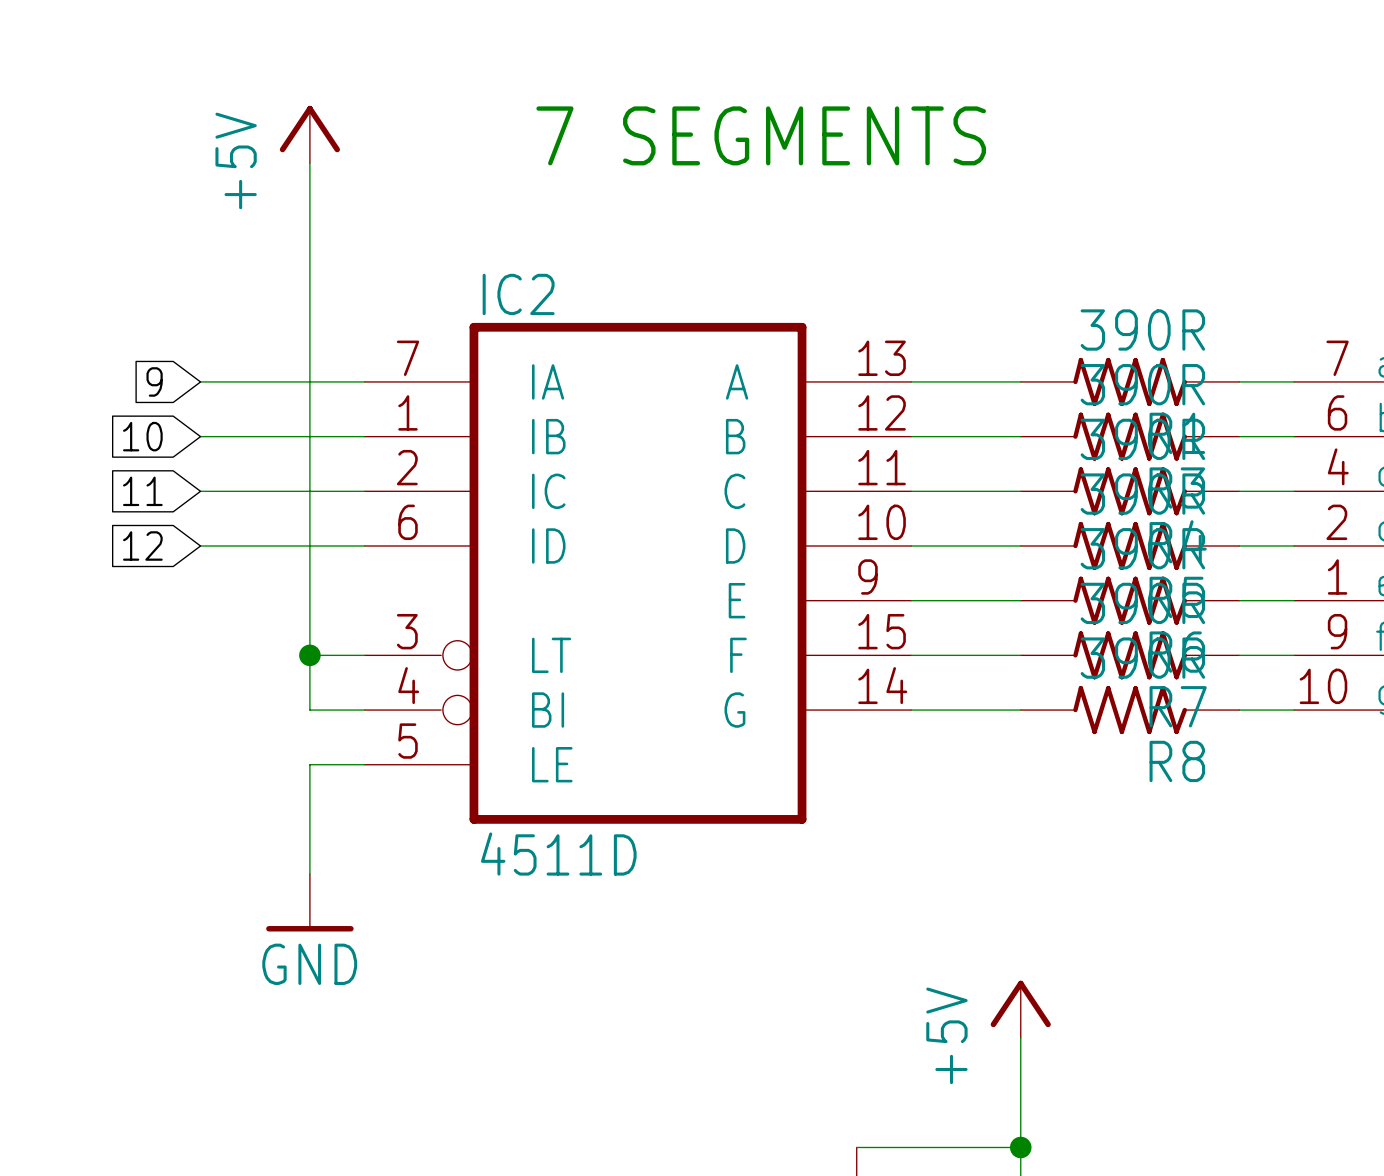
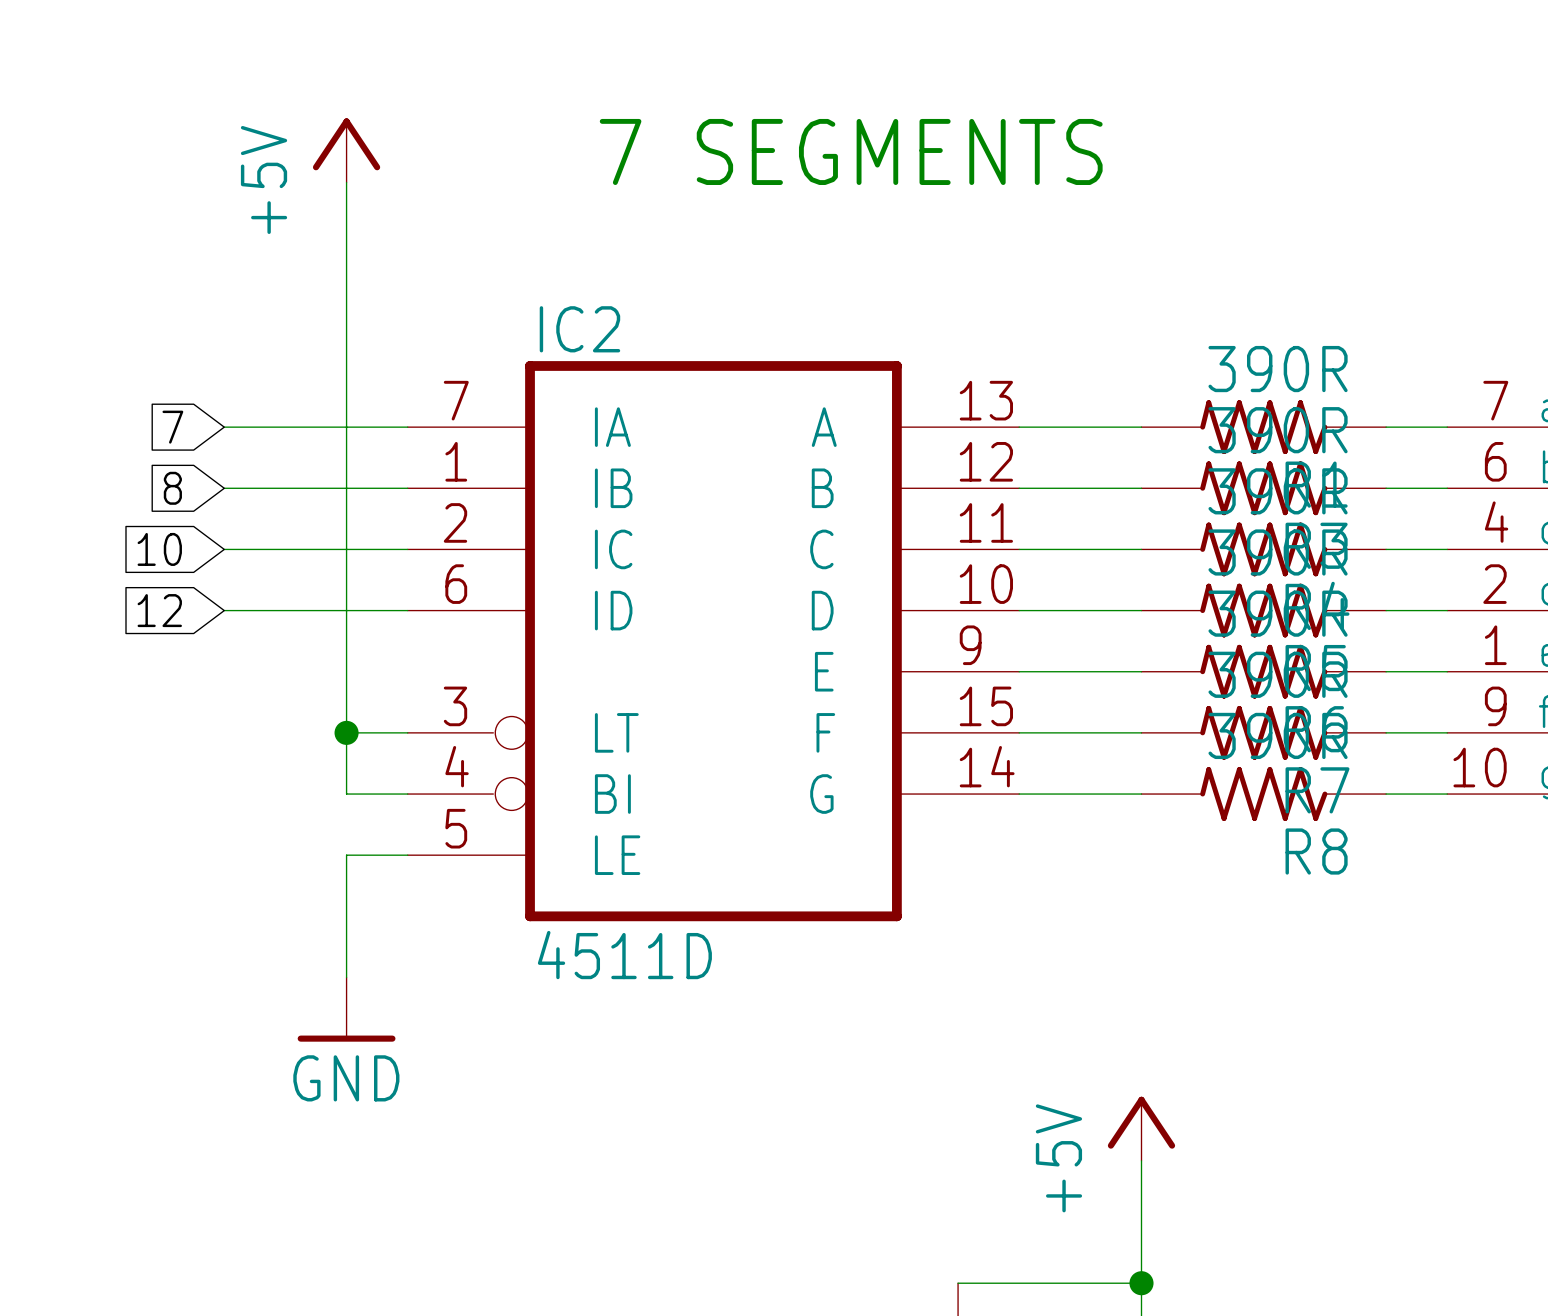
global label: 9 (154, 381) -> 7 (172, 427)
global label: 10 (142, 436) -> 8 (172, 488)
global label: 11 (142, 491) -> 10 (159, 549)

